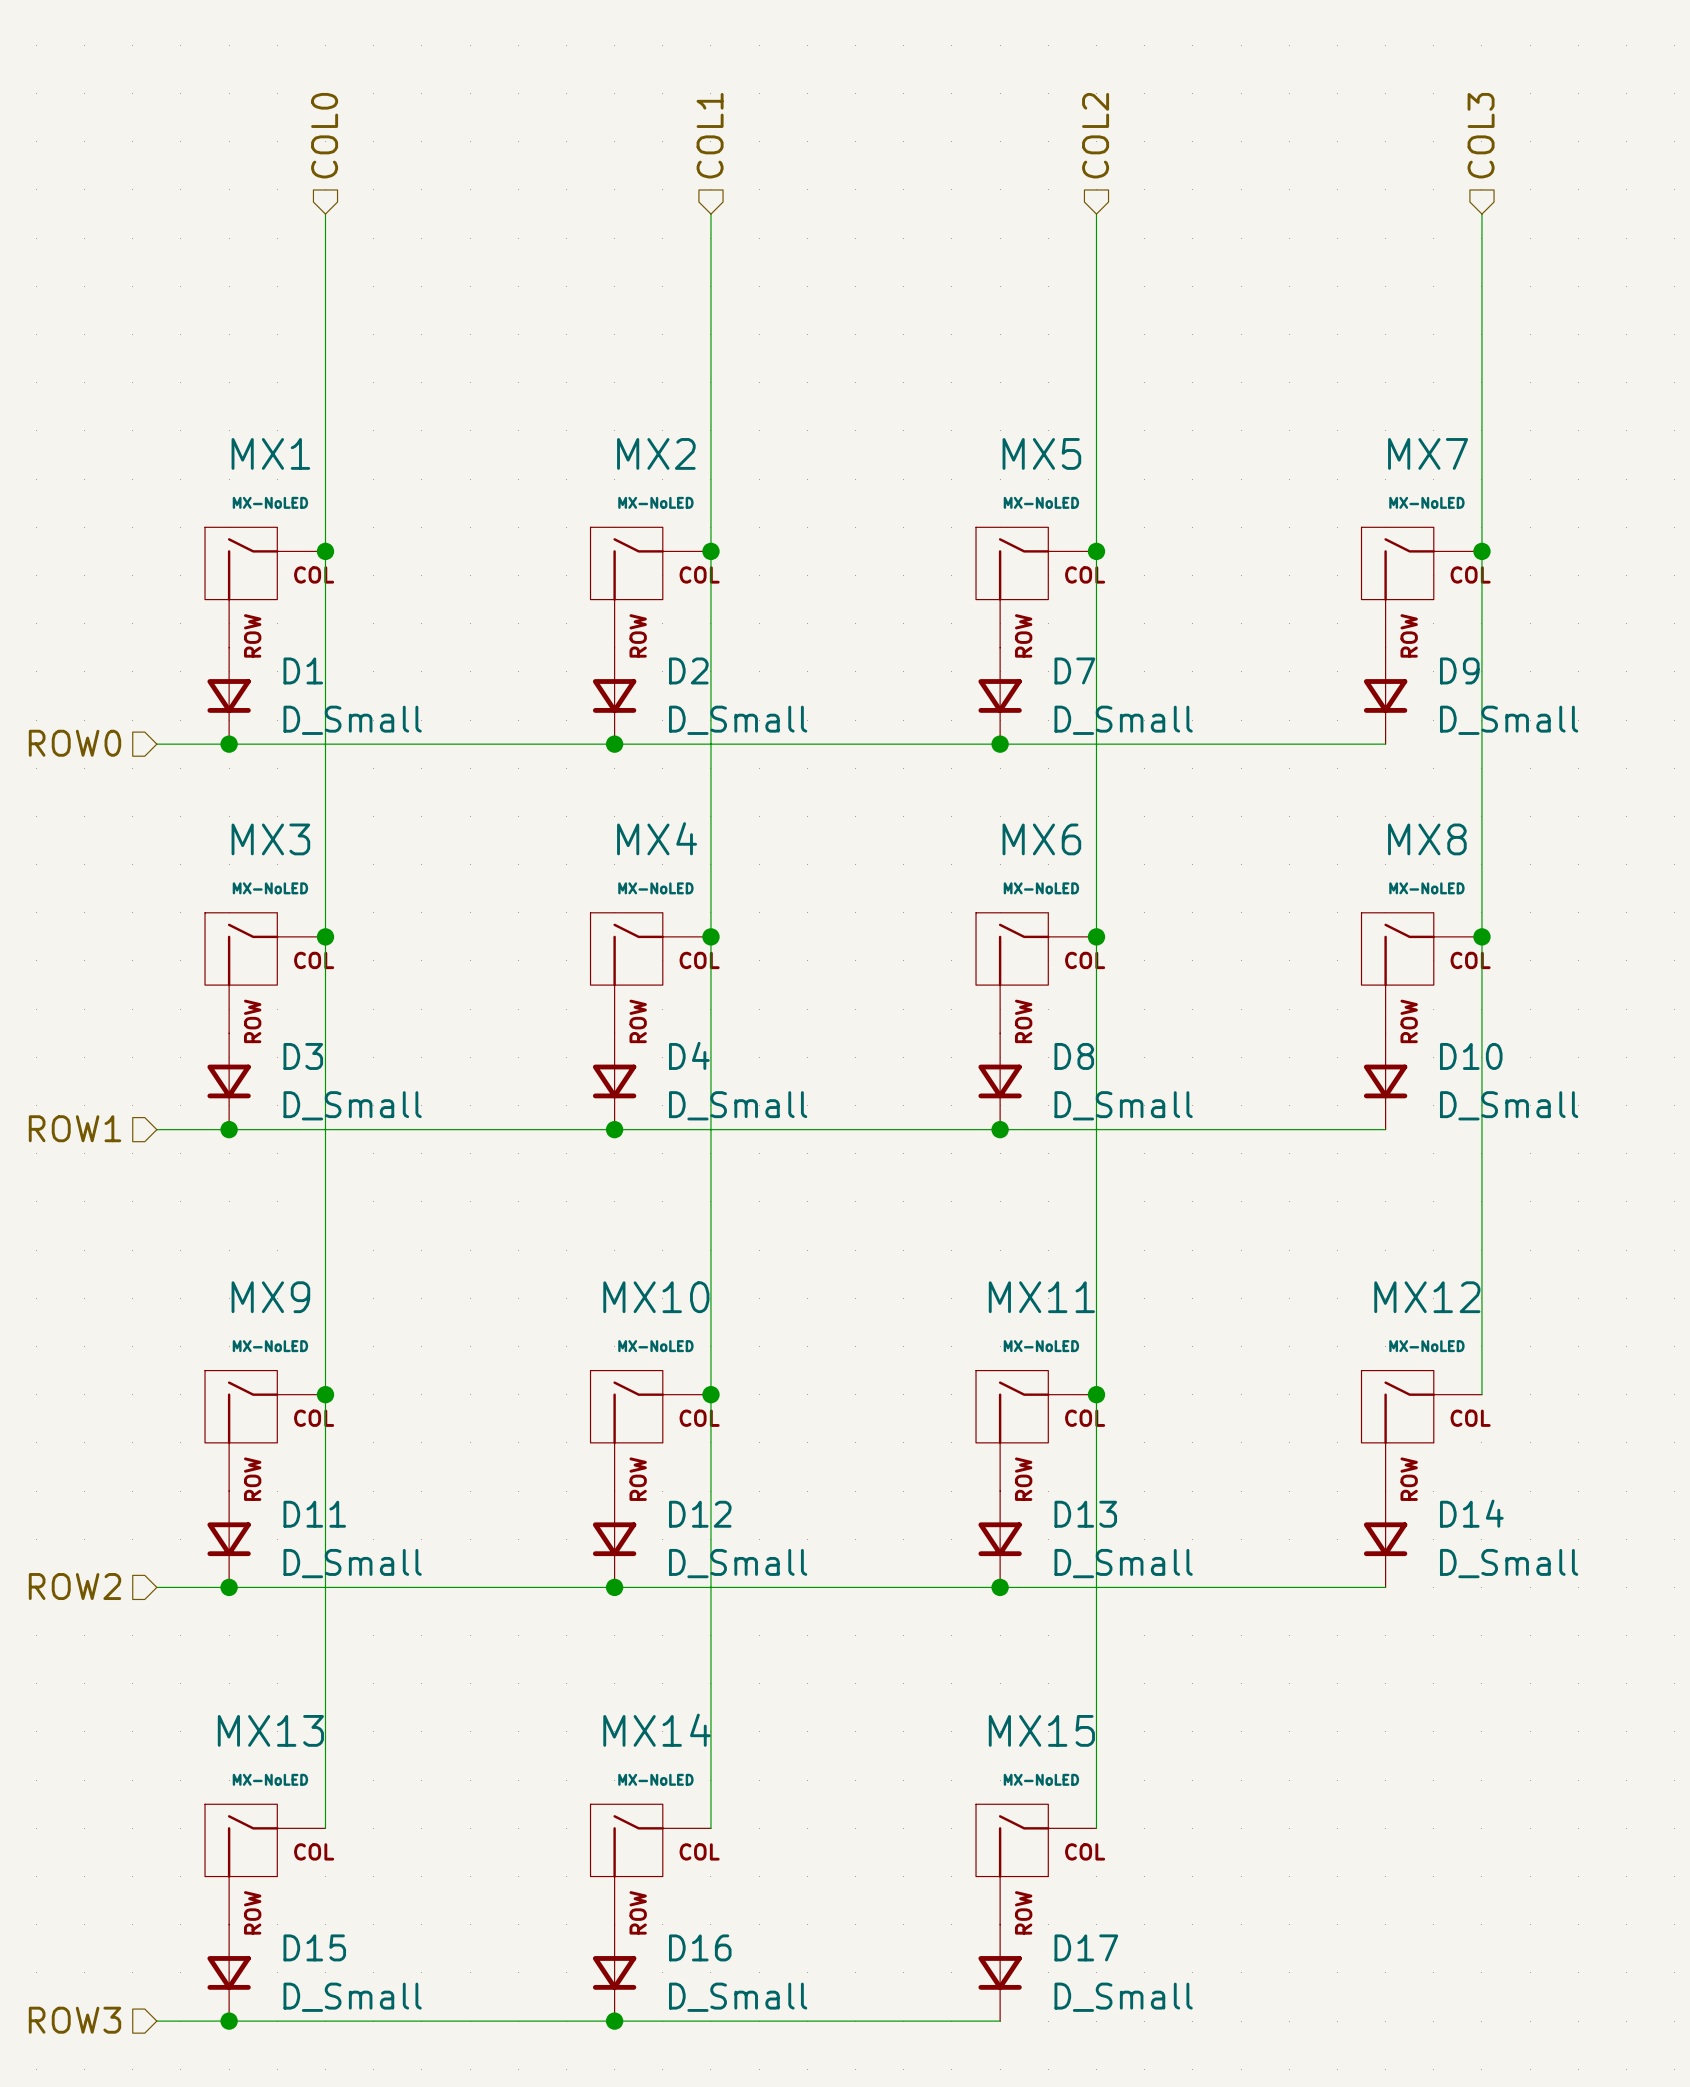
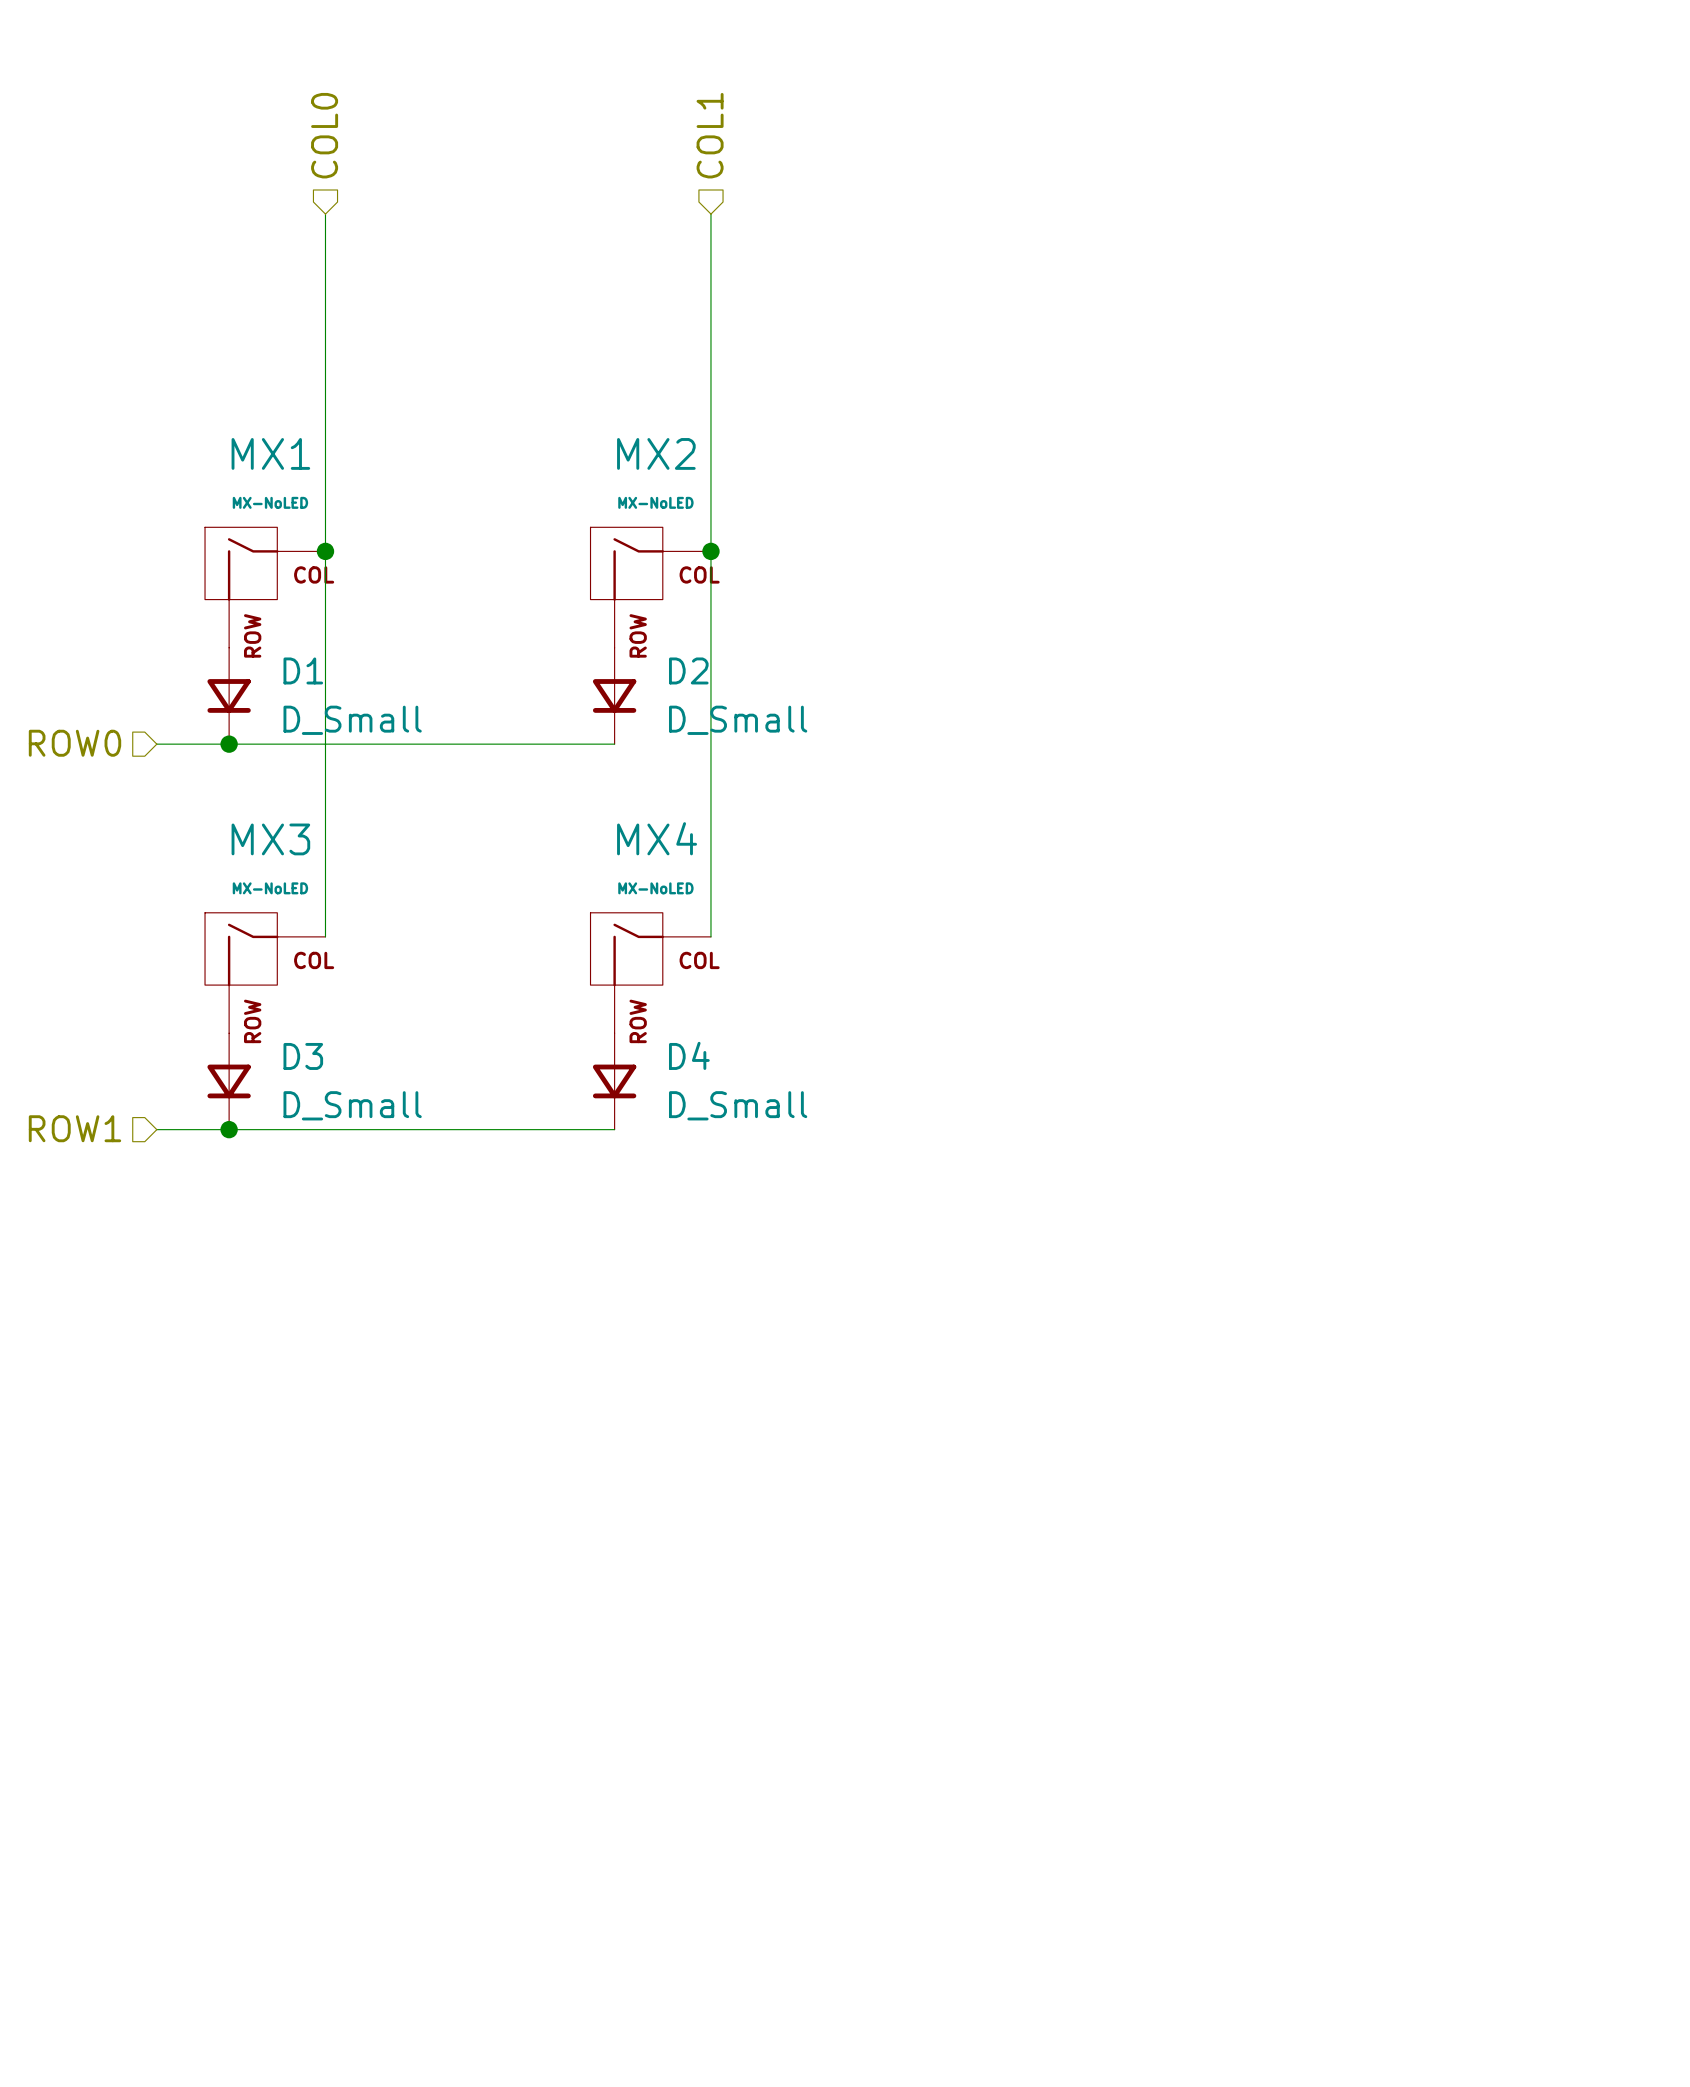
hierarchical label: COL2 (1095, 135) -> none
hierarchical label: COL3 (1481, 135) -> none
wire: (1096, 214) (1096, 1828) -> none
wire: (1481, 214) (1481, 1394) -> none
junction: (1096, 551) -> none
junction: (1481, 551) -> none
MX5: MX-NoLED (1036, 587) -> none
MX7: MX-NoLED (1421, 587) -> none
D7: D_Small (1000, 695) -> none
D9: D_Small (1385, 695) -> none
wire: (614, 744) (1385, 744) -> none
junction: (614, 744) -> none
junction: (1000, 744) -> none
wire: (325, 936) (325, 1828) -> none
junction: (325, 936) -> none
wire: (710, 936) (710, 1828) -> none
junction: (710, 936) -> none
junction: (1096, 936) -> none
junction: (1481, 936) -> none
MX6: MX-NoLED (1036, 973) -> none
MX8: MX-NoLED (1421, 973) -> none
D8: D_Small (1000, 1081) -> none
D10: D_Small (1385, 1081) -> none
wire: (614, 1129) (1385, 1129) -> none
junction: (614, 1129) -> none
junction: (1000, 1129) -> none
junction: (325, 1394) -> none
junction: (710, 1394) -> none
junction: (1096, 1394) -> none
MX9: MX-NoLED (265, 1430) -> none
MX10: MX-NoLED (650, 1430) -> none
MX11: MX-NoLED (1036, 1430) -> none
MX12: MX-NoLED (1421, 1430) -> none
D11: D_Small (229, 1539) -> none
D12: D_Small (614, 1539) -> none
D13: D_Small (1000, 1539) -> none
D14: D_Small (1385, 1539) -> none
hierarchical label: ROW2 (74, 1586) -> none
wire: (156, 1587) (1385, 1587) -> none
junction: (229, 1587) -> none
junction: (614, 1587) -> none
junction: (1000, 1587) -> none
MX13: MX-NoLED (265, 1864) -> none
MX14: MX-NoLED (650, 1864) -> none
MX15: MX-NoLED (1036, 1864) -> none
D15: D_Small (229, 1972) -> none
D16: D_Small (614, 1972) -> none
D17: D_Small (1000, 1972) -> none
hierarchical label: ROW3 (74, 2020) -> none
wire: (156, 2021) (1000, 2021) -> none
junction: (229, 2021) -> none
junction: (614, 2021) -> none

